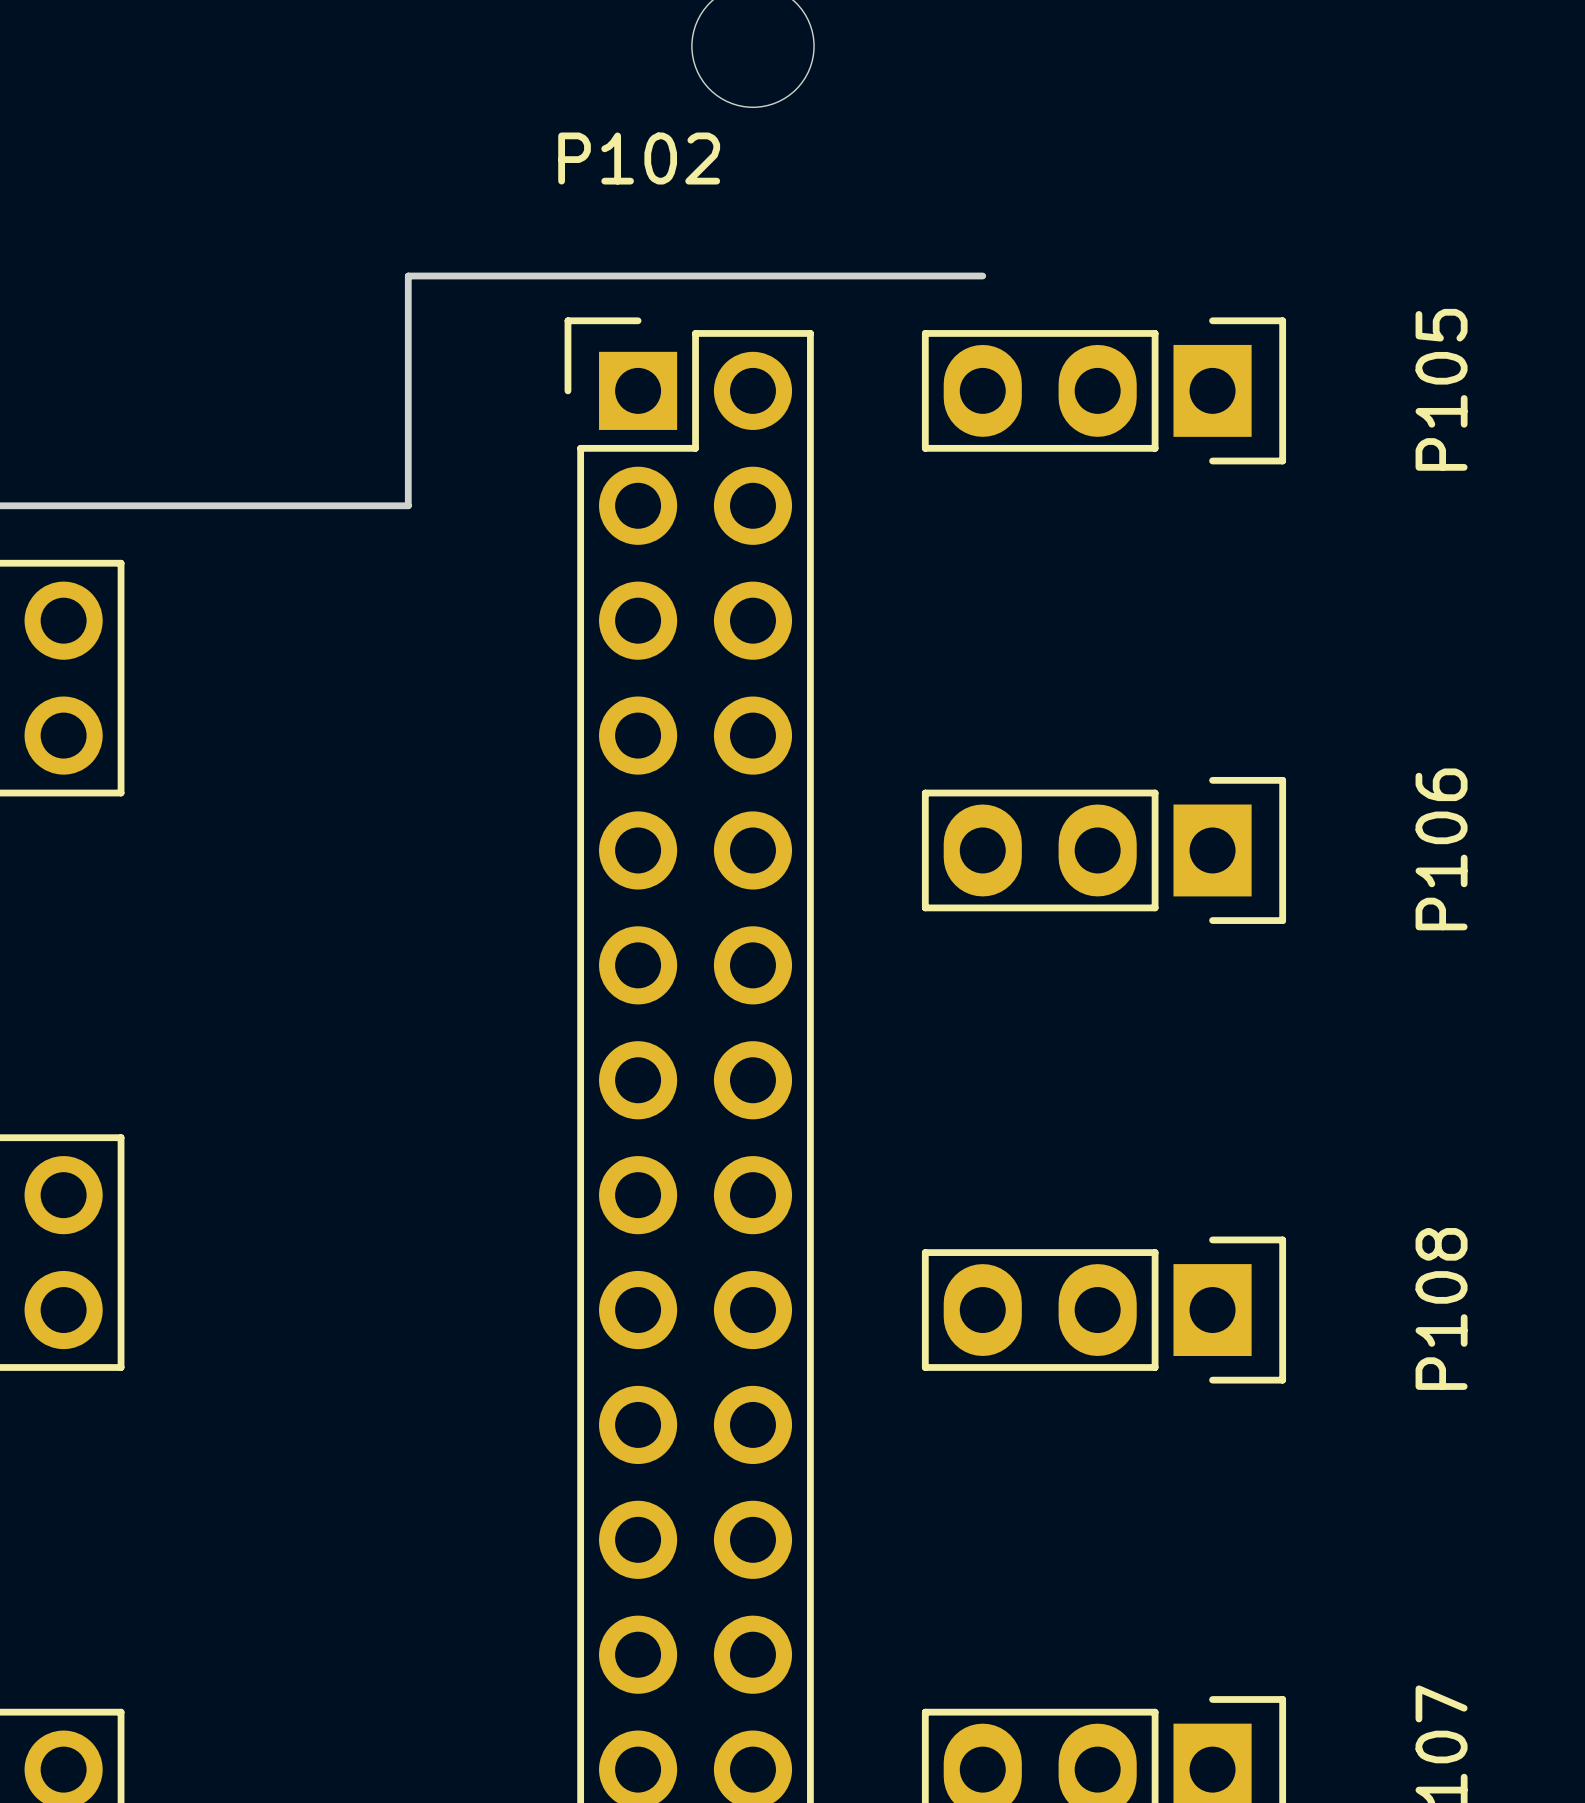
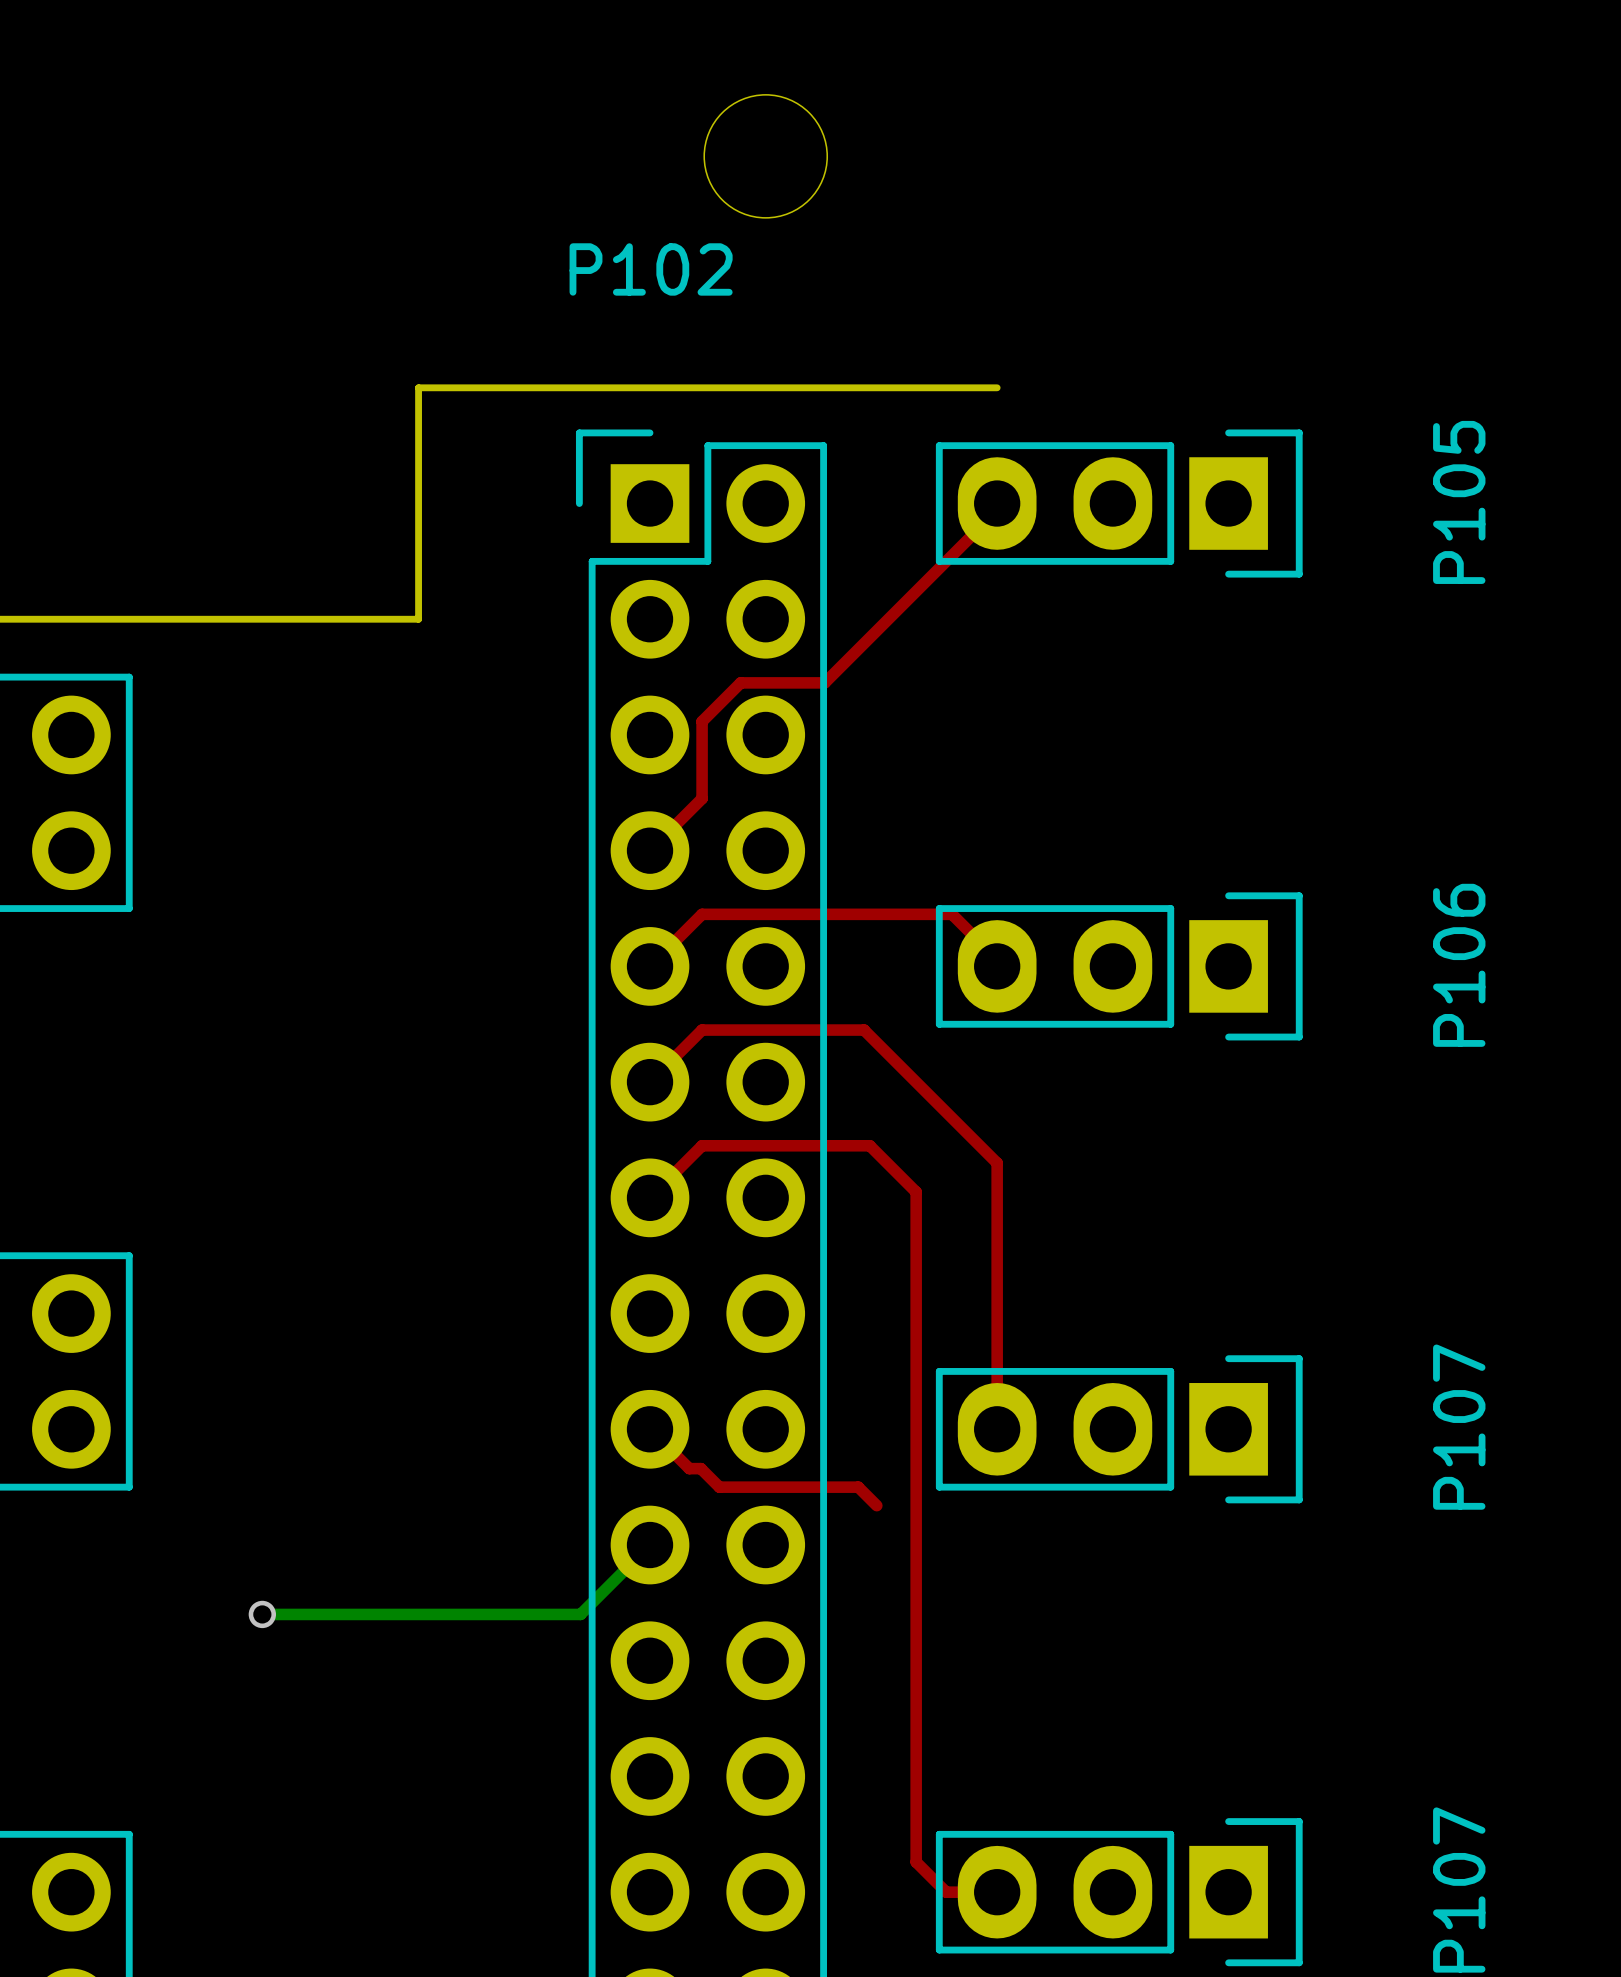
top track: none -> (997, 503) (997, 510) (824, 682) (740, 682) (702, 721) (702, 798) (650, 850)
top track: none -> (650, 966) (702, 914) (952, 914) (997, 959) (997, 966)
top track: none -> (650, 1082) (702, 1030) (864, 1030) (997, 1163) (997, 1429)
top track: none -> (650, 1197) (702, 1145) (869, 1145) (916, 1192) (916, 1862) (946, 1892) (997, 1892)
P108 name: P108 (1441, 1308) -> P107 (1459, 1427)
top track: none -> (650, 1429) (689, 1468) (700, 1468) (719, 1487) (858, 1487) (876, 1505)
bottom track: none -> (650, 1545) (580, 1614) (262, 1614)
via: none -> (262, 1614)

